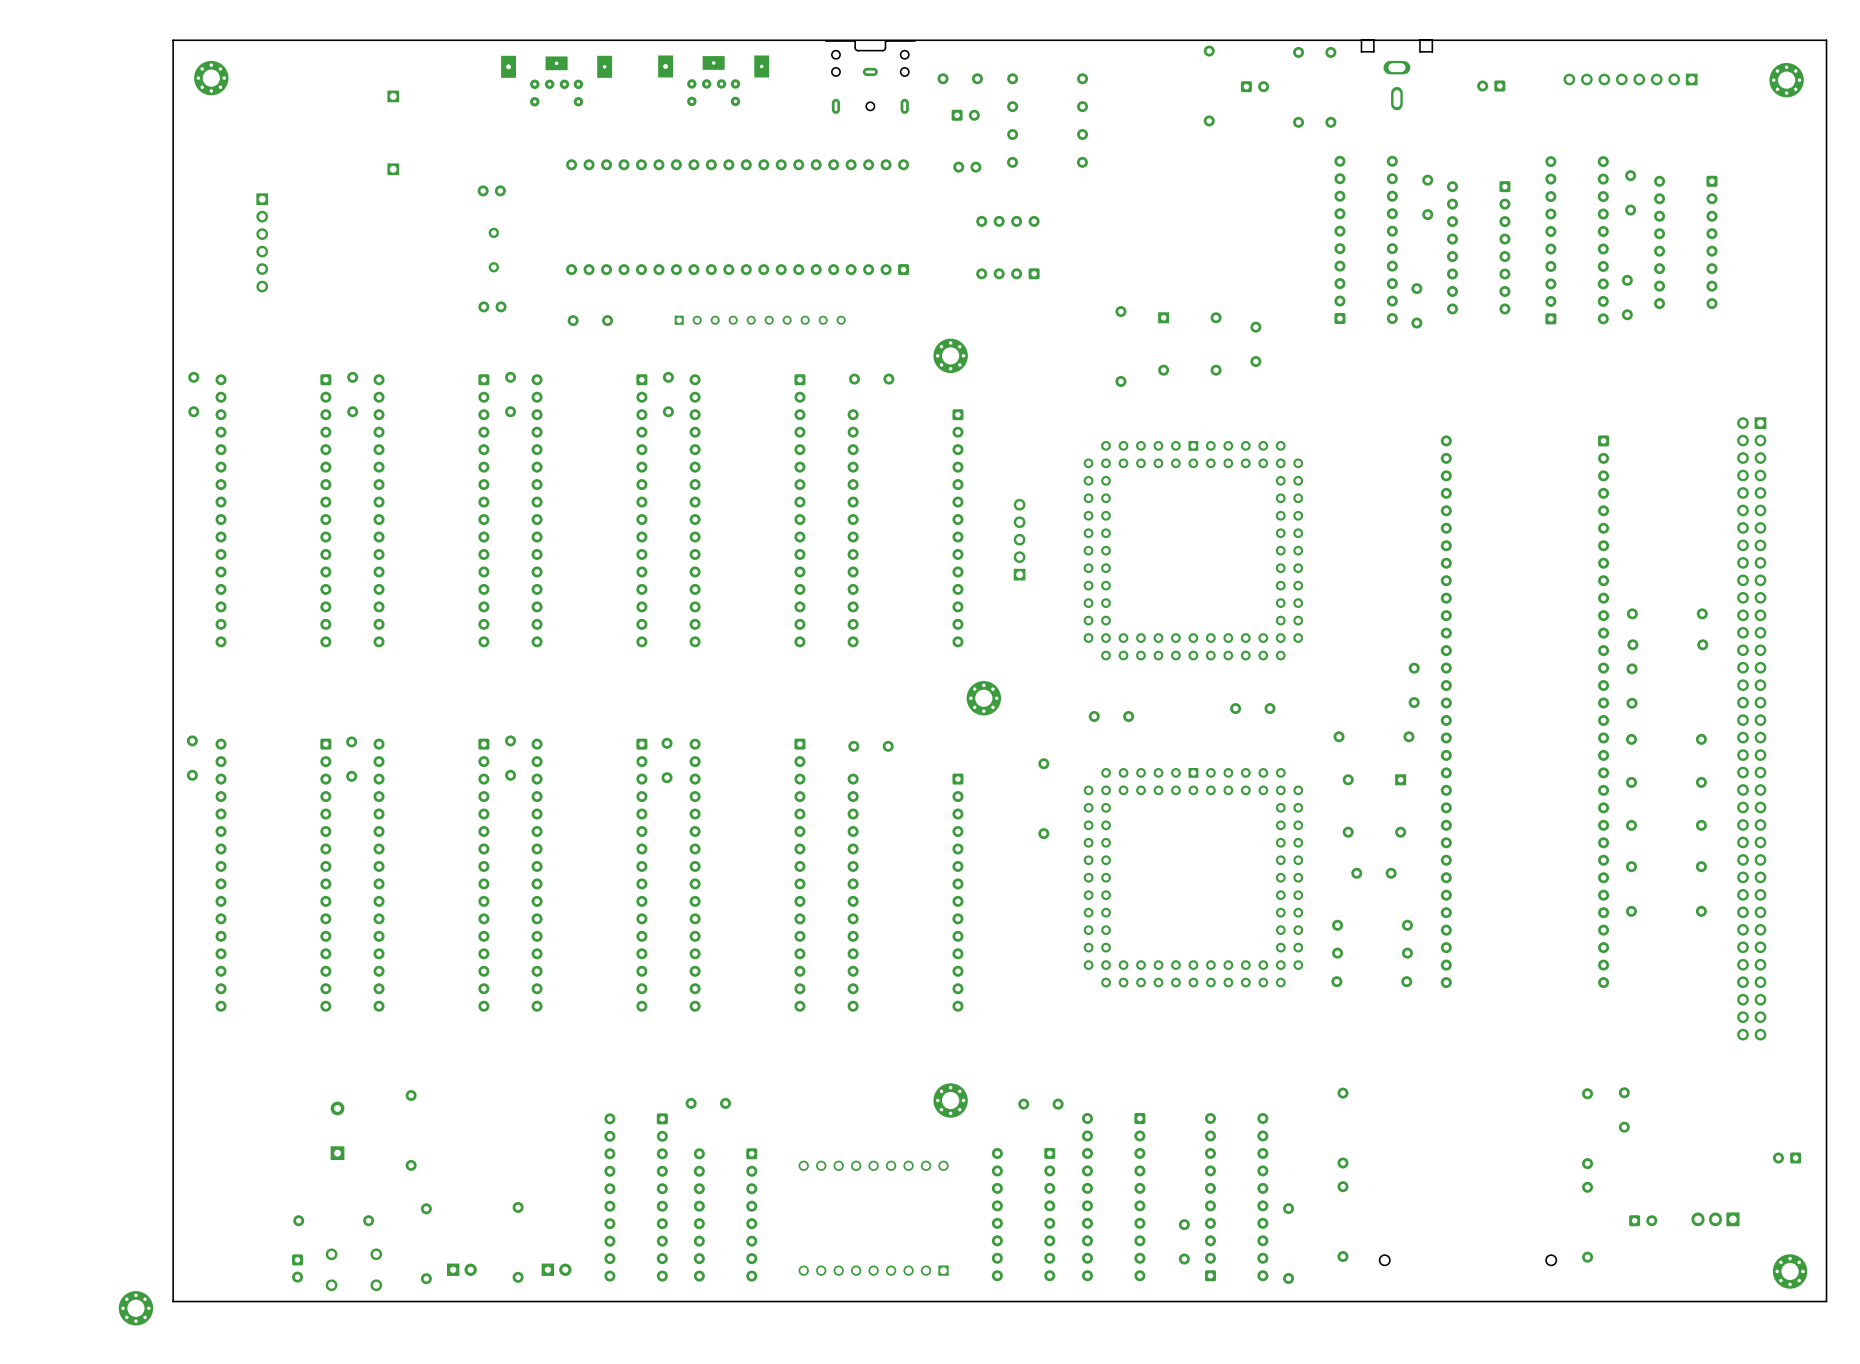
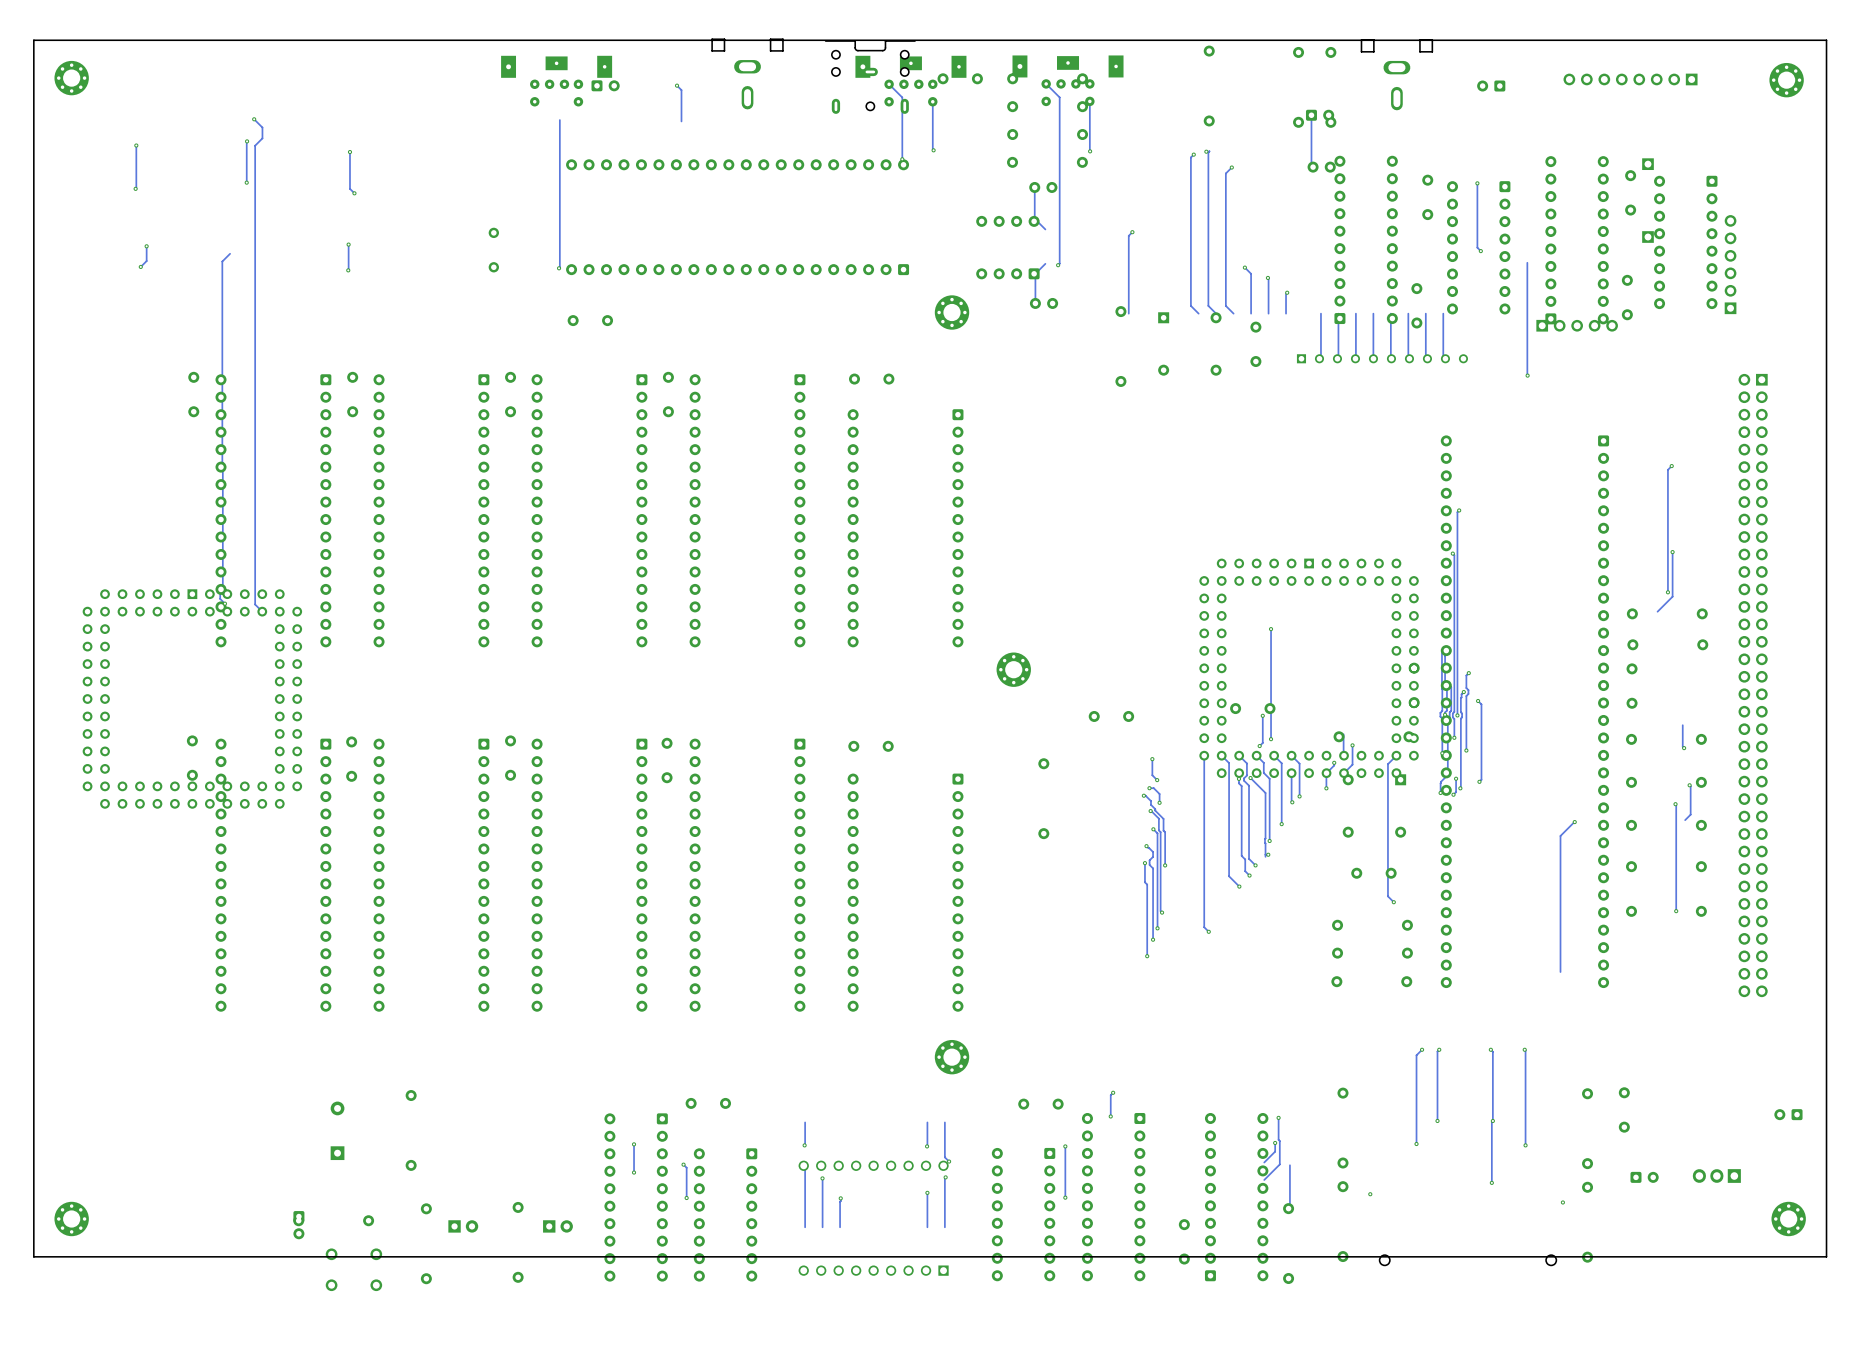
board edge: (173, 40) (173, 1301) (1826, 1301) (1826, 1256) -> (173, 40) (33, 40) (33, 1256) (1826, 1256)
part: none -> (747, 74)
part position: (211, 78) -> (71, 78)
part: (713, 80) -> none
part: none -> (1068, 80)
part: none -> (910, 81)
track: none -> (1046, 83) (1059, 97) (1059, 263) (1058, 265)
track: none -> (889, 84) (902, 97) (902, 159)
part: none -> (605, 85)
track: none -> (677, 85) (681, 90) (681, 121)
via: none -> (677, 85)
part position: (1254, 86) -> (1320, 115)
part: (393, 96) -> none
track: none -> (932, 101) (933, 150)
track: none -> (1089, 101) (1090, 151)
part: (965, 115) -> none
track: none -> (1311, 115) (1311, 165) (1313, 167)
track: none -> (254, 119) (262, 127) (262, 138) (255, 145) (255, 604) (262, 611)
via: none -> (254, 119)
track: none -> (559, 120) (559, 268)
track: none -> (247, 141) (246, 182)
via: none -> (247, 141)
track: none -> (136, 145) (135, 188)
via: none -> (136, 145)
via: none -> (933, 150)
via: none -> (1090, 151)
via: none -> (1206, 151)
track: none -> (1209, 151) (1208, 305) (1216, 313)
track: none -> (349, 152) (349, 188) (354, 193)
via: none -> (349, 152)
track: none -> (1193, 154) (1190, 157) (1190, 305) (1198, 313)
via: none -> (1193, 154)
via: none -> (902, 159)
part: none -> (1648, 164)
part: (967, 167) -> none
track: none -> (1231, 167) (1225, 173) (1225, 305) (1233, 313)
via: none -> (1231, 167)
part: none -> (1321, 167)
part: (393, 169) -> none
via: none -> (246, 182)
track: none -> (1477, 183) (1477, 247) (1480, 251)
via: none -> (1477, 183)
track: none -> (1034, 187) (1034, 218) (1045, 229)
part: none -> (1043, 187)
via: none -> (135, 188)
part: (491, 190) -> none
via: none -> (354, 193)
track: none -> (1132, 232) (1128, 235) (1128, 313)
via: none -> (1132, 232)
part: none -> (1648, 237)
part: (262, 242) -> none
track: none -> (348, 244) (348, 270)
via: none -> (348, 244)
track: none -> (146, 246) (146, 261) (140, 266)
via: none -> (146, 246)
via: none -> (1480, 251)
track: none -> (230, 253) (222, 261) (222, 588) (220, 591) (220, 598) (224, 603)
track: none -> (1527, 262) (1527, 375)
track: none -> (1045, 263) (1035, 273) (1035, 303)
part: none -> (1730, 264)
via: none -> (1058, 265)
via: none -> (140, 266)
track: none -> (1244, 267) (1251, 273) (1251, 313)
via: none -> (1244, 267)
via: none -> (559, 268)
via: none -> (348, 270)
track: none -> (1267, 277) (1268, 313)
via: none -> (1267, 277)
via: none -> (1287, 292)
track: none -> (1286, 293) (1286, 313)
part: none -> (1044, 303)
part: (492, 306) -> none
track: none -> (1320, 313) (1319, 358)
track: none -> (1338, 313) (1337, 358)
track: none -> (1355, 313) (1355, 358)
track: none -> (1373, 313) (1373, 358)
track: none -> (1390, 313) (1391, 358)
track: none -> (1408, 313) (1409, 358)
track: none -> (1425, 313) (1425, 357) (1427, 358)
track: none -> (1443, 313) (1443, 356) (1445, 358)
part: (760, 320) -> none
part: none -> (1577, 325)
part position: (950, 355) -> (952, 312)
part: none -> (1382, 358)
via: none -> (1527, 375)
track: none -> (1671, 466) (1667, 469) (1667, 592)
via: none -> (1671, 466)
track: none -> (1459, 510) (1457, 512) (1457, 715)
via: none -> (1459, 510)
part: (1019, 539) -> none
part: (1193, 550) -> none
track: none -> (1672, 552) (1672, 596) (1657, 611)
via: none -> (1672, 552)
track: none -> (1452, 553) (1454, 555) (1454, 711) (1452, 713) (1454, 737)
via: none -> (1452, 553)
via: none -> (1667, 592)
via: none -> (224, 603)
track: none -> (1271, 629) (1271, 739)
via: none -> (1271, 629)
track: none -> (1444, 648) (1441, 651) (1442, 710) (1440, 712) (1442, 718) (1442, 753)
track: none -> (1450, 650) (1445, 655) (1445, 687) (1446, 689) (1446, 710) (1445, 714)
part: none -> (1309, 668)
track: none -> (1468, 673) (1466, 675) (1466, 688) (1468, 690) (1466, 696) (1466, 750)
via: none -> (1468, 673)
track: none -> (1449, 685) (1451, 710) (1447, 720) (1447, 770)
track: none -> (1463, 692) (1460, 698) (1460, 788)
via: none -> (1463, 692)
part position: (983, 698) -> (1013, 669)
part: none -> (192, 699)
track: none -> (1478, 701) (1481, 704) (1481, 779) (1479, 781)
via: none -> (1478, 701)
via: none -> (1445, 714)
track: none -> (1262, 715) (1262, 742) (1259, 746)
via: none -> (1262, 715)
via: none -> (1457, 715)
track: none -> (1682, 725) (1684, 748)
part position: (1751, 728) -> (1753, 685)
track: none -> (1343, 734) (1344, 755)
via: none -> (1454, 737)
via: none -> (1271, 739)
track: none -> (1352, 745) (1352, 764) (1344, 773)
via: none -> (1352, 745)
via: none -> (1259, 746)
via: none -> (1684, 748)
via: none -> (1466, 750)
via: none -> (1442, 753)
track: none -> (1204, 755) (1204, 927) (1208, 931)
track: none -> (1221, 755) (1229, 763) (1229, 876) (1239, 886)
track: none -> (1239, 755) (1246, 763) (1246, 775) (1244, 780) (1249, 785) (1249, 858) (1255, 865)
track: none -> (1256, 755) (1263, 762) (1263, 772) (1269, 778) (1269, 840)
track: none -> (1274, 755) (1281, 763) (1281, 824)
track: none -> (1291, 755) (1299, 763) (1299, 796)
track: none -> (1396, 755) (1387, 764) (1387, 896) (1393, 902)
track: none -> (1152, 759) (1152, 775) (1157, 780)
via: none -> (1152, 759)
track: none -> (1334, 762) (1334, 765) (1326, 773) (1326, 788)
via: none -> (1334, 762)
track: none -> (1291, 773) (1292, 802)
track: none -> (1448, 775) (1440, 781) (1440, 792)
track: none -> (1238, 778) (1238, 783) (1241, 786) (1241, 855) (1245, 859) (1245, 871) (1249, 875)
via: none -> (1238, 778)
track: none -> (1250, 778) (1265, 792) (1265, 856)
via: none -> (1250, 778)
track: none -> (1456, 778) (1456, 792) (1453, 794)
via: none -> (1456, 778)
via: none -> (1157, 780)
via: none -> (1479, 781)
track: none -> (1689, 785) (1690, 814) (1685, 820)
via: none -> (1689, 785)
track: none -> (1149, 788) (1153, 788) (1159, 794) (1159, 802)
via: none -> (1149, 788)
via: none -> (1326, 788)
via: none -> (1460, 788)
via: none -> (1440, 792)
via: none -> (1453, 794)
track: none -> (1143, 795) (1150, 801) (1150, 804) (1163, 818) (1165, 865)
via: none -> (1143, 795)
via: none -> (1299, 796)
via: none -> (1159, 802)
via: none -> (1292, 802)
track: none -> (1675, 804) (1676, 911)
via: none -> (1675, 804)
track: none -> (1150, 811) (1158, 818) (1160, 832) (1162, 912)
via: none -> (1150, 811)
track: none -> (1574, 822) (1560, 835) (1560, 972)
via: none -> (1574, 822)
via: none -> (1281, 824)
track: none -> (1153, 829) (1157, 833) (1157, 928)
via: none -> (1153, 829)
via: none -> (1269, 840)
track: none -> (1146, 846) (1153, 851) (1153, 856) (1149, 860) (1149, 864) (1153, 868) (1153, 939)
via: none -> (1146, 846)
via: none -> (1268, 854)
track: none -> (1144, 863) (1144, 882) (1147, 884) (1147, 956)
via: none -> (1144, 863)
via: none -> (1165, 865)
via: none -> (1255, 865)
via: none -> (1249, 875)
part: (1193, 877) -> none
via: none -> (1239, 886)
via: none -> (1393, 902)
via: none -> (1676, 911)
via: none -> (1162, 912)
via: none -> (1157, 928)
via: none -> (1208, 931)
via: none -> (1153, 939)
via: none -> (1147, 956)
track: none -> (1422, 1049) (1416, 1055) (1416, 1144)
via: none -> (1422, 1049)
track: none -> (1439, 1049) (1437, 1051) (1437, 1120)
via: none -> (1439, 1049)
track: none -> (1490, 1049) (1492, 1051) (1491, 1182)
via: none -> (1490, 1049)
track: none -> (1524, 1049) (1525, 1145)
via: none -> (1524, 1049)
track: none -> (1113, 1092) (1110, 1095) (1110, 1116)
via: none -> (1113, 1092)
part position: (950, 1100) -> (952, 1057)
via: none -> (1110, 1116)
track: none -> (1278, 1117) (1279, 1164) (1264, 1179)
via: none -> (1278, 1117)
via: none -> (1437, 1120)
via: none -> (1492, 1120)
track: none -> (805, 1122) (804, 1145)
track: none -> (927, 1122) (927, 1146)
track: none -> (944, 1122) (944, 1157) (949, 1161)
track: none -> (1275, 1142) (1275, 1151) (1264, 1162)
via: none -> (1275, 1142)
track: none -> (634, 1144) (634, 1172)
via: none -> (634, 1144)
via: none -> (1416, 1144)
via: none -> (804, 1145)
via: none -> (1525, 1145)
via: none -> (927, 1146)
track: none -> (1065, 1146) (1065, 1197)
via: none -> (1065, 1146)
part position: (1787, 1157) -> (1788, 1114)
via: none -> (949, 1161)
track: none -> (803, 1163) (805, 1227)
track: none -> (683, 1164) (686, 1167) (686, 1198)
via: none -> (683, 1164)
track: none -> (1289, 1165) (1289, 1212)
via: none -> (634, 1172)
track: none -> (945, 1177) (944, 1227)
via: none -> (945, 1177)
track: none -> (822, 1178) (822, 1227)
via: none -> (822, 1178)
via: none -> (1491, 1182)
track: none -> (927, 1192) (927, 1227)
via: none -> (927, 1192)
via: none -> (1370, 1194)
via: none -> (1065, 1197)
via: none -> (686, 1198)
track: none -> (840, 1198) (840, 1227)
via: none -> (840, 1198)
via: none -> (1562, 1202)
part position: (1715, 1219) -> (1716, 1176)
part position: (1643, 1220) -> (1644, 1177)
part position: (297, 1268) -> (298, 1225)
part position: (461, 1269) -> (463, 1226)
part position: (556, 1269) -> (557, 1226)
part position: (1790, 1271) -> (1788, 1218)
part position: (135, 1308) -> (71, 1218)

